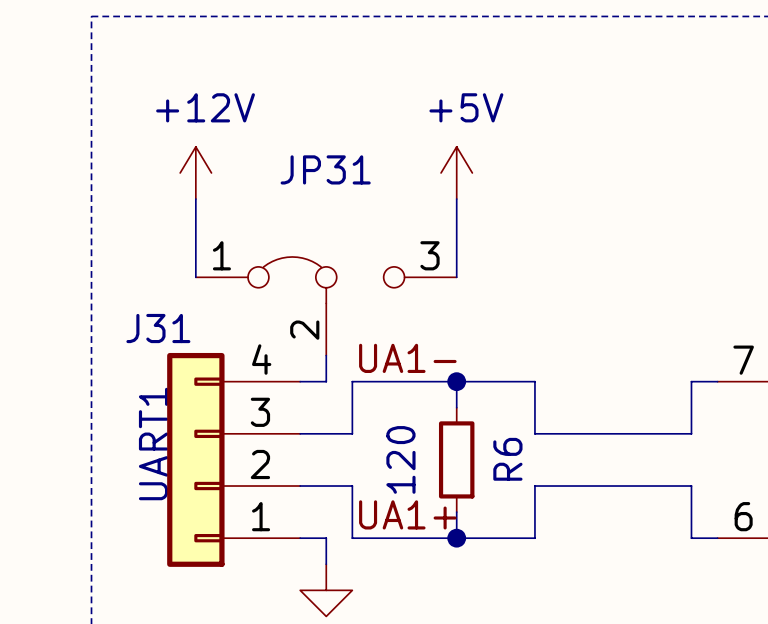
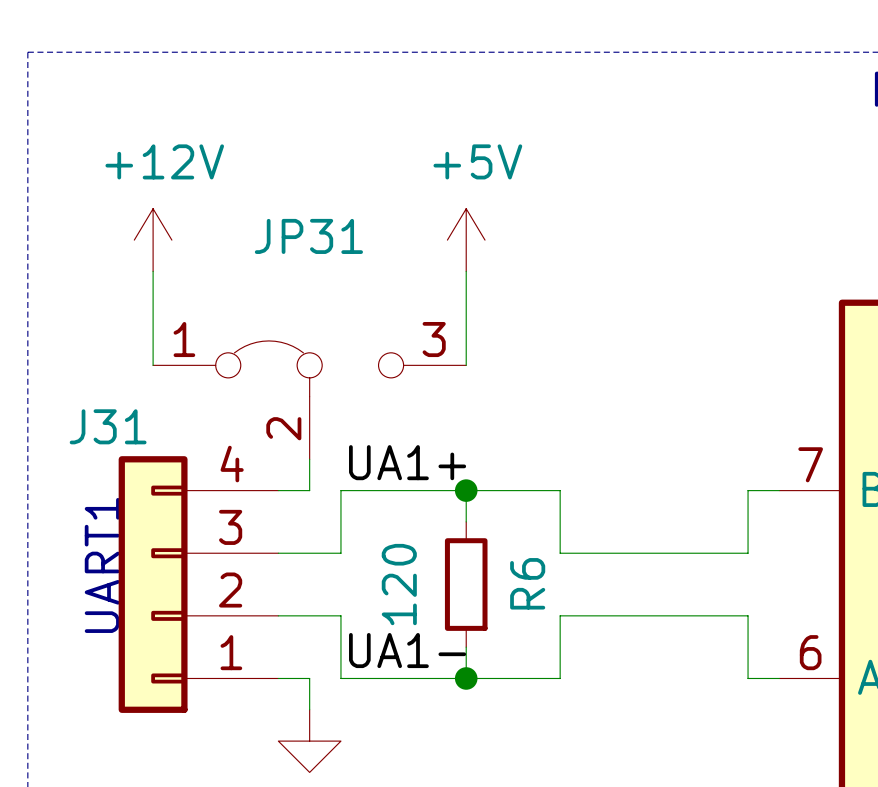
label: UA1- (407, 358) -> UA1+ (407, 462)
label: UA1+ (407, 514) -> UA1- (407, 650)

